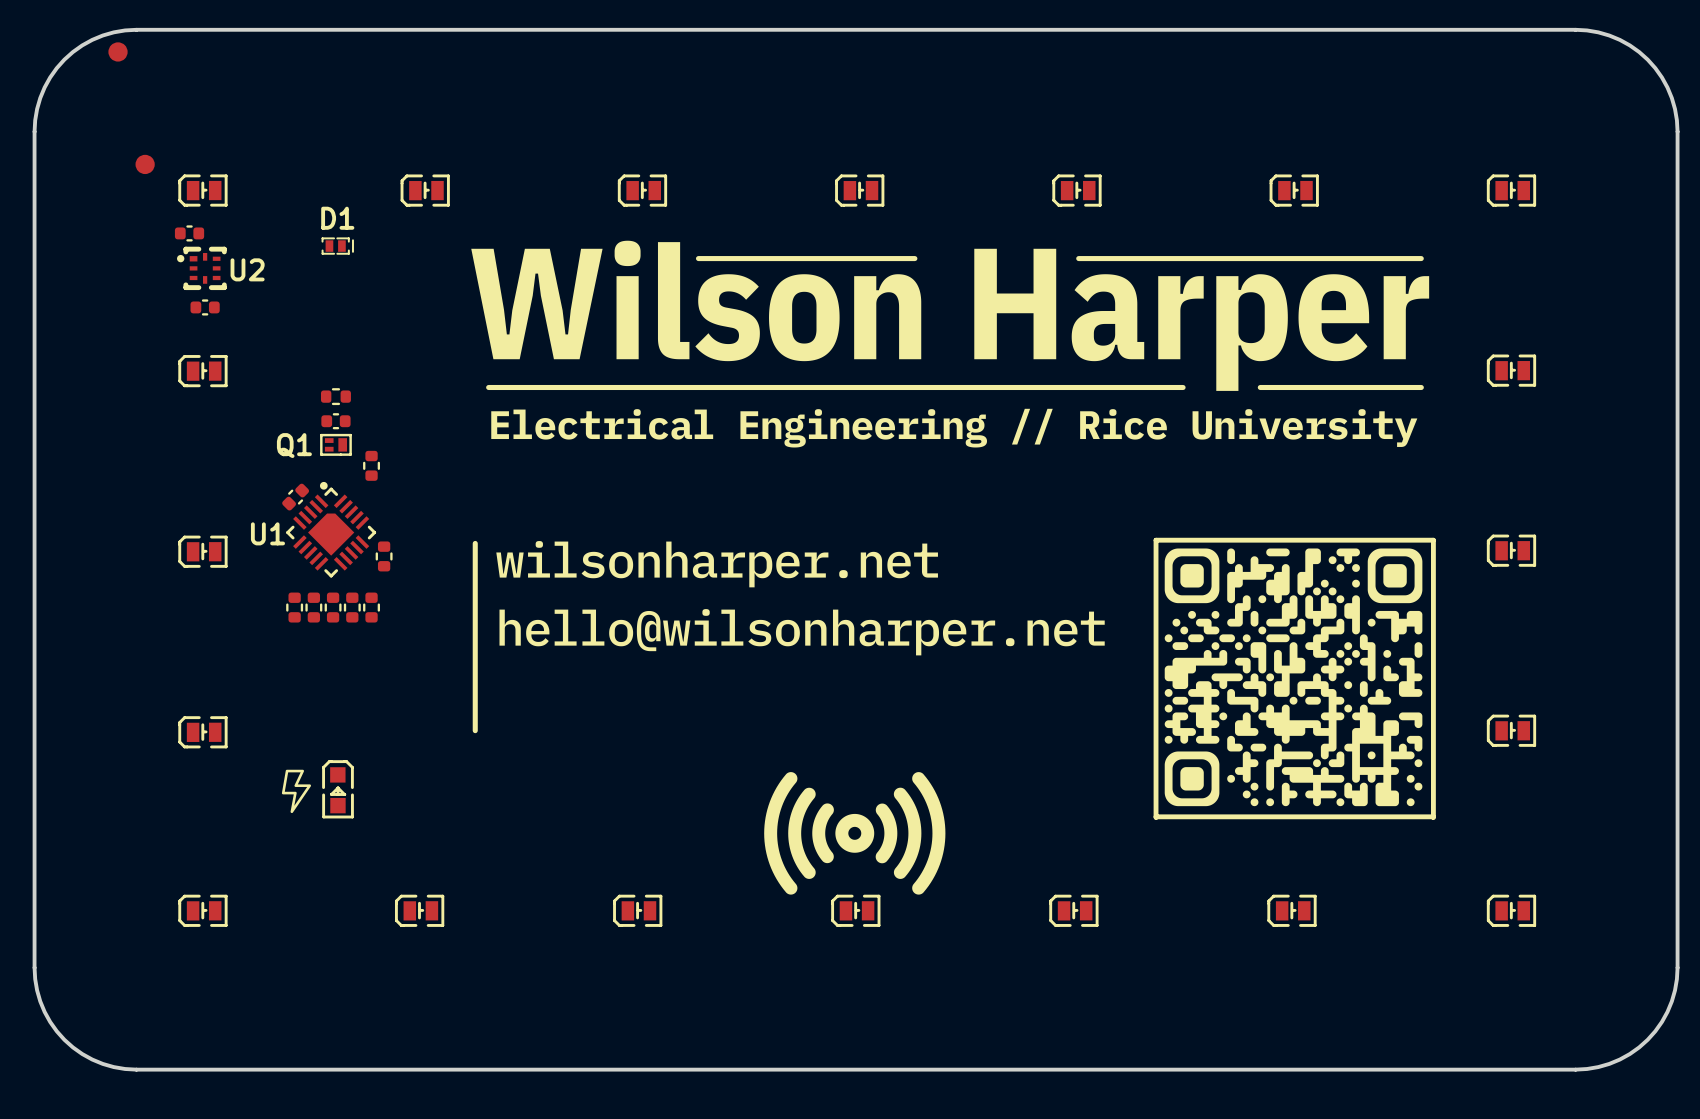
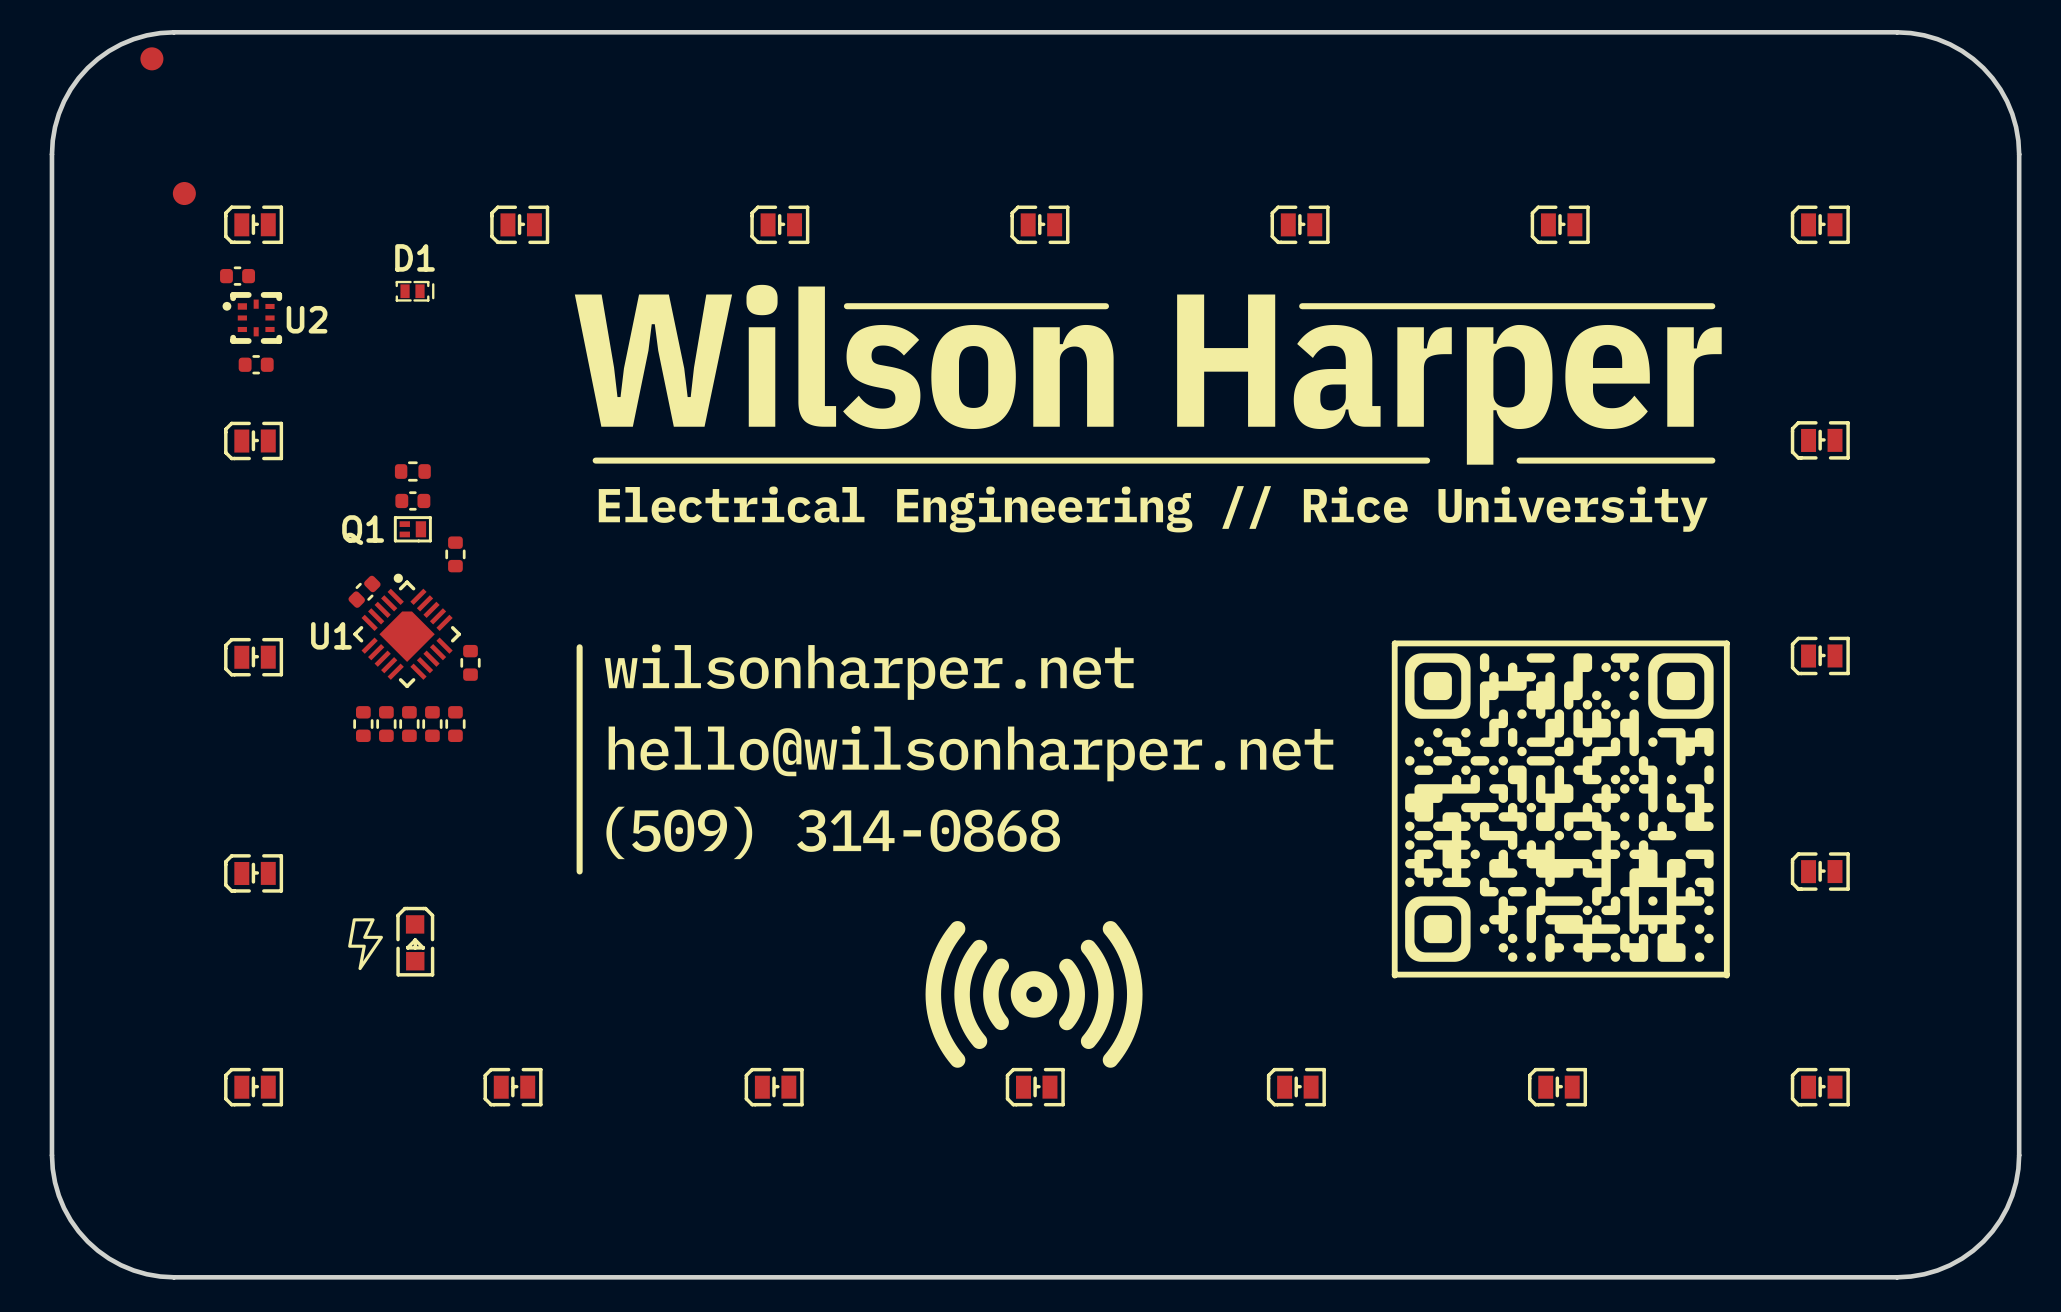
drawing: none -> [606, 806, 753, 860]
drawing: none -> [797, 809, 1061, 852]

